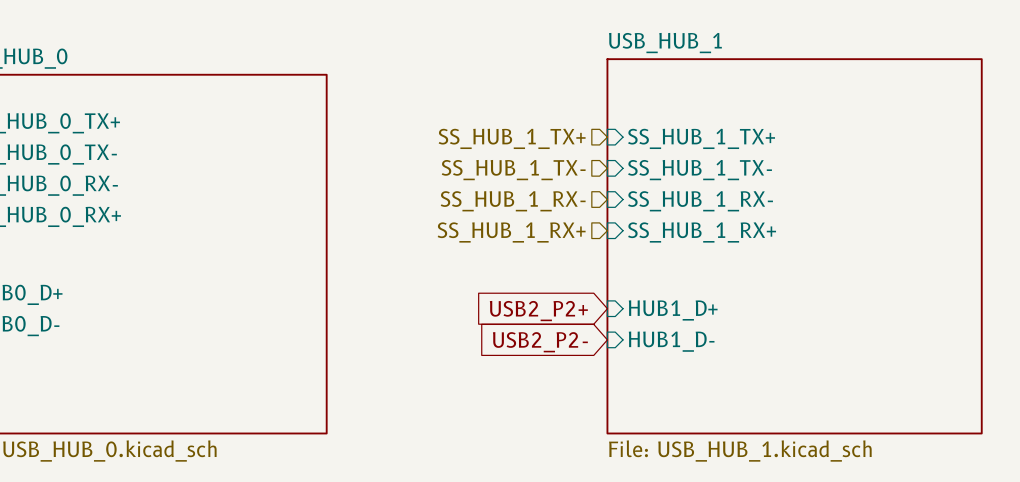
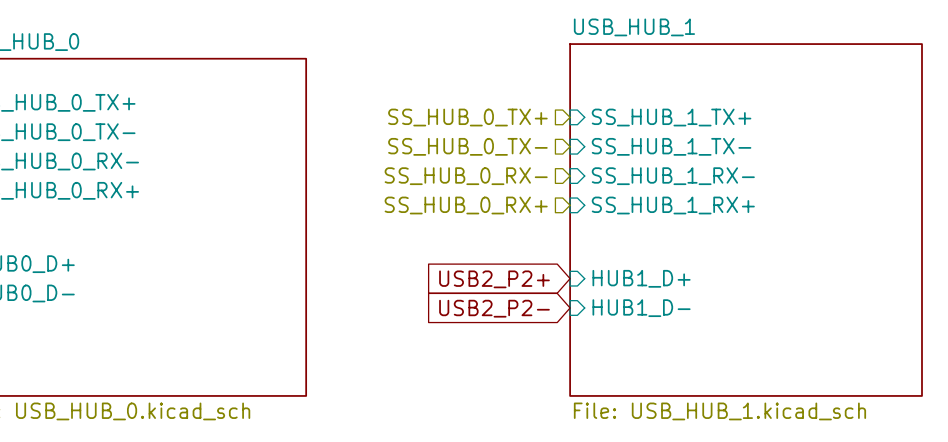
hierarchical label: SS_HUB_1_TX+ (512, 138) -> SS_HUB_0_TX+ (467, 117)
hierarchical label: SS_HUB_1_TX- (513, 170) -> SS_HUB_0_TX- (467, 146)
hierarchical label: SS_HUB_1_RX- (513, 201) -> SS_HUB_0_RX- (466, 176)
hierarchical label: SS_HUB_1_RX+ (511, 232) -> SS_HUB_0_RX+ (466, 205)

